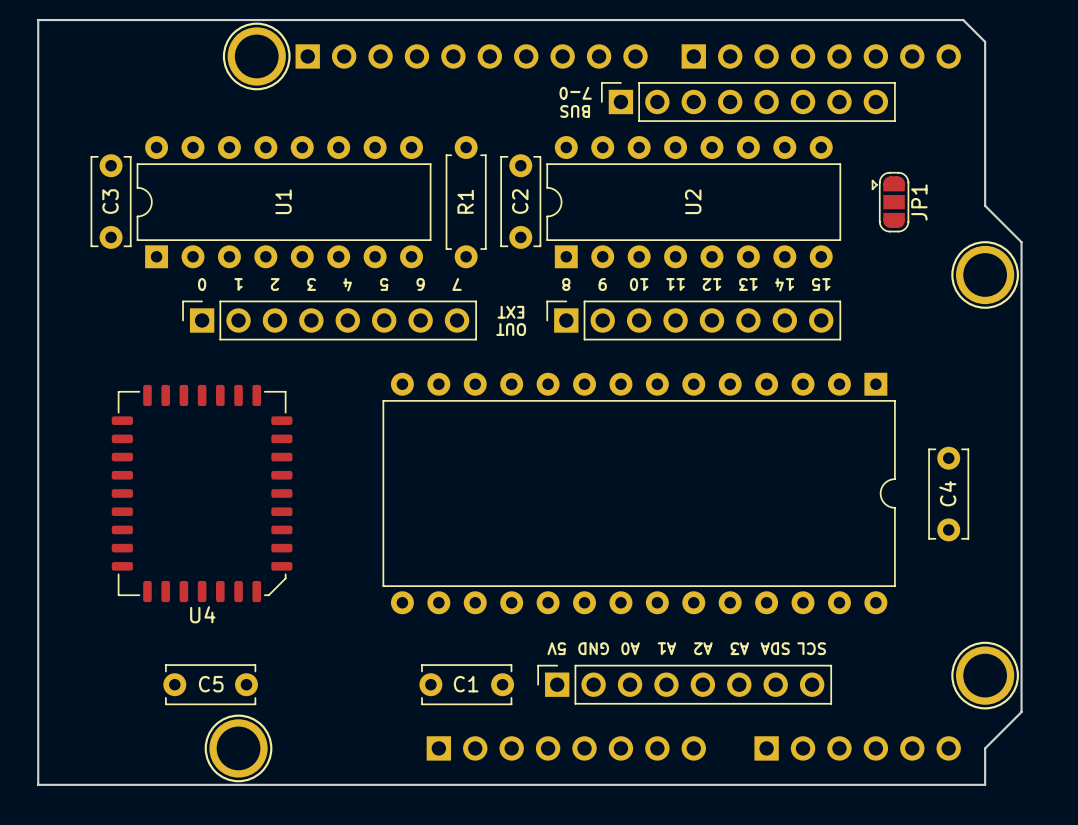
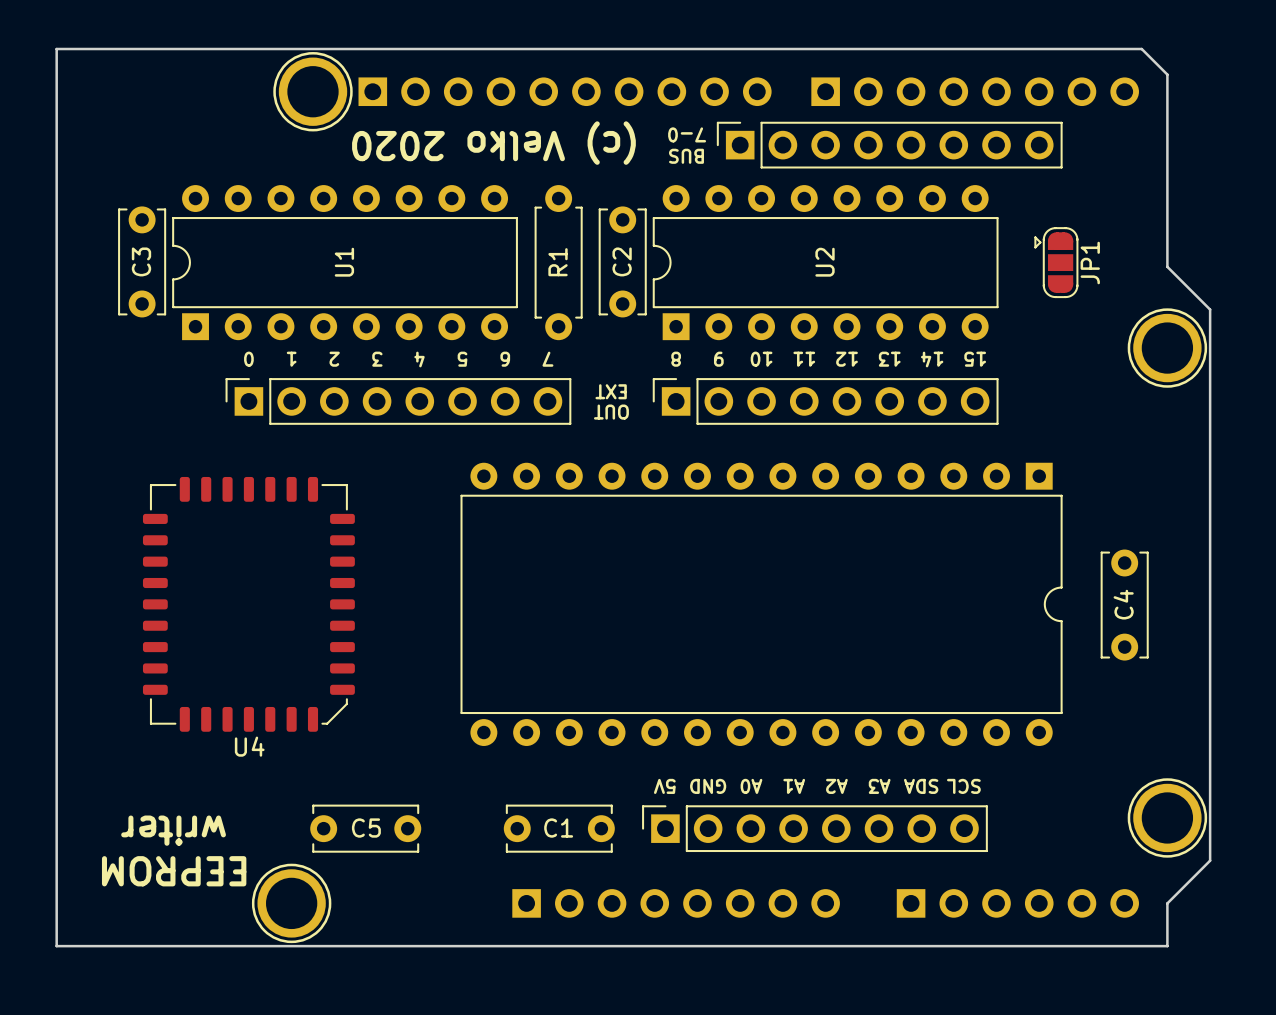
text: none -> (c) Velko 2020 (493, 143)
C5 position: (210, 684) -> (365, 828)
text: none -> writer (173, 830)
text: none -> EEPROM (174, 871)

